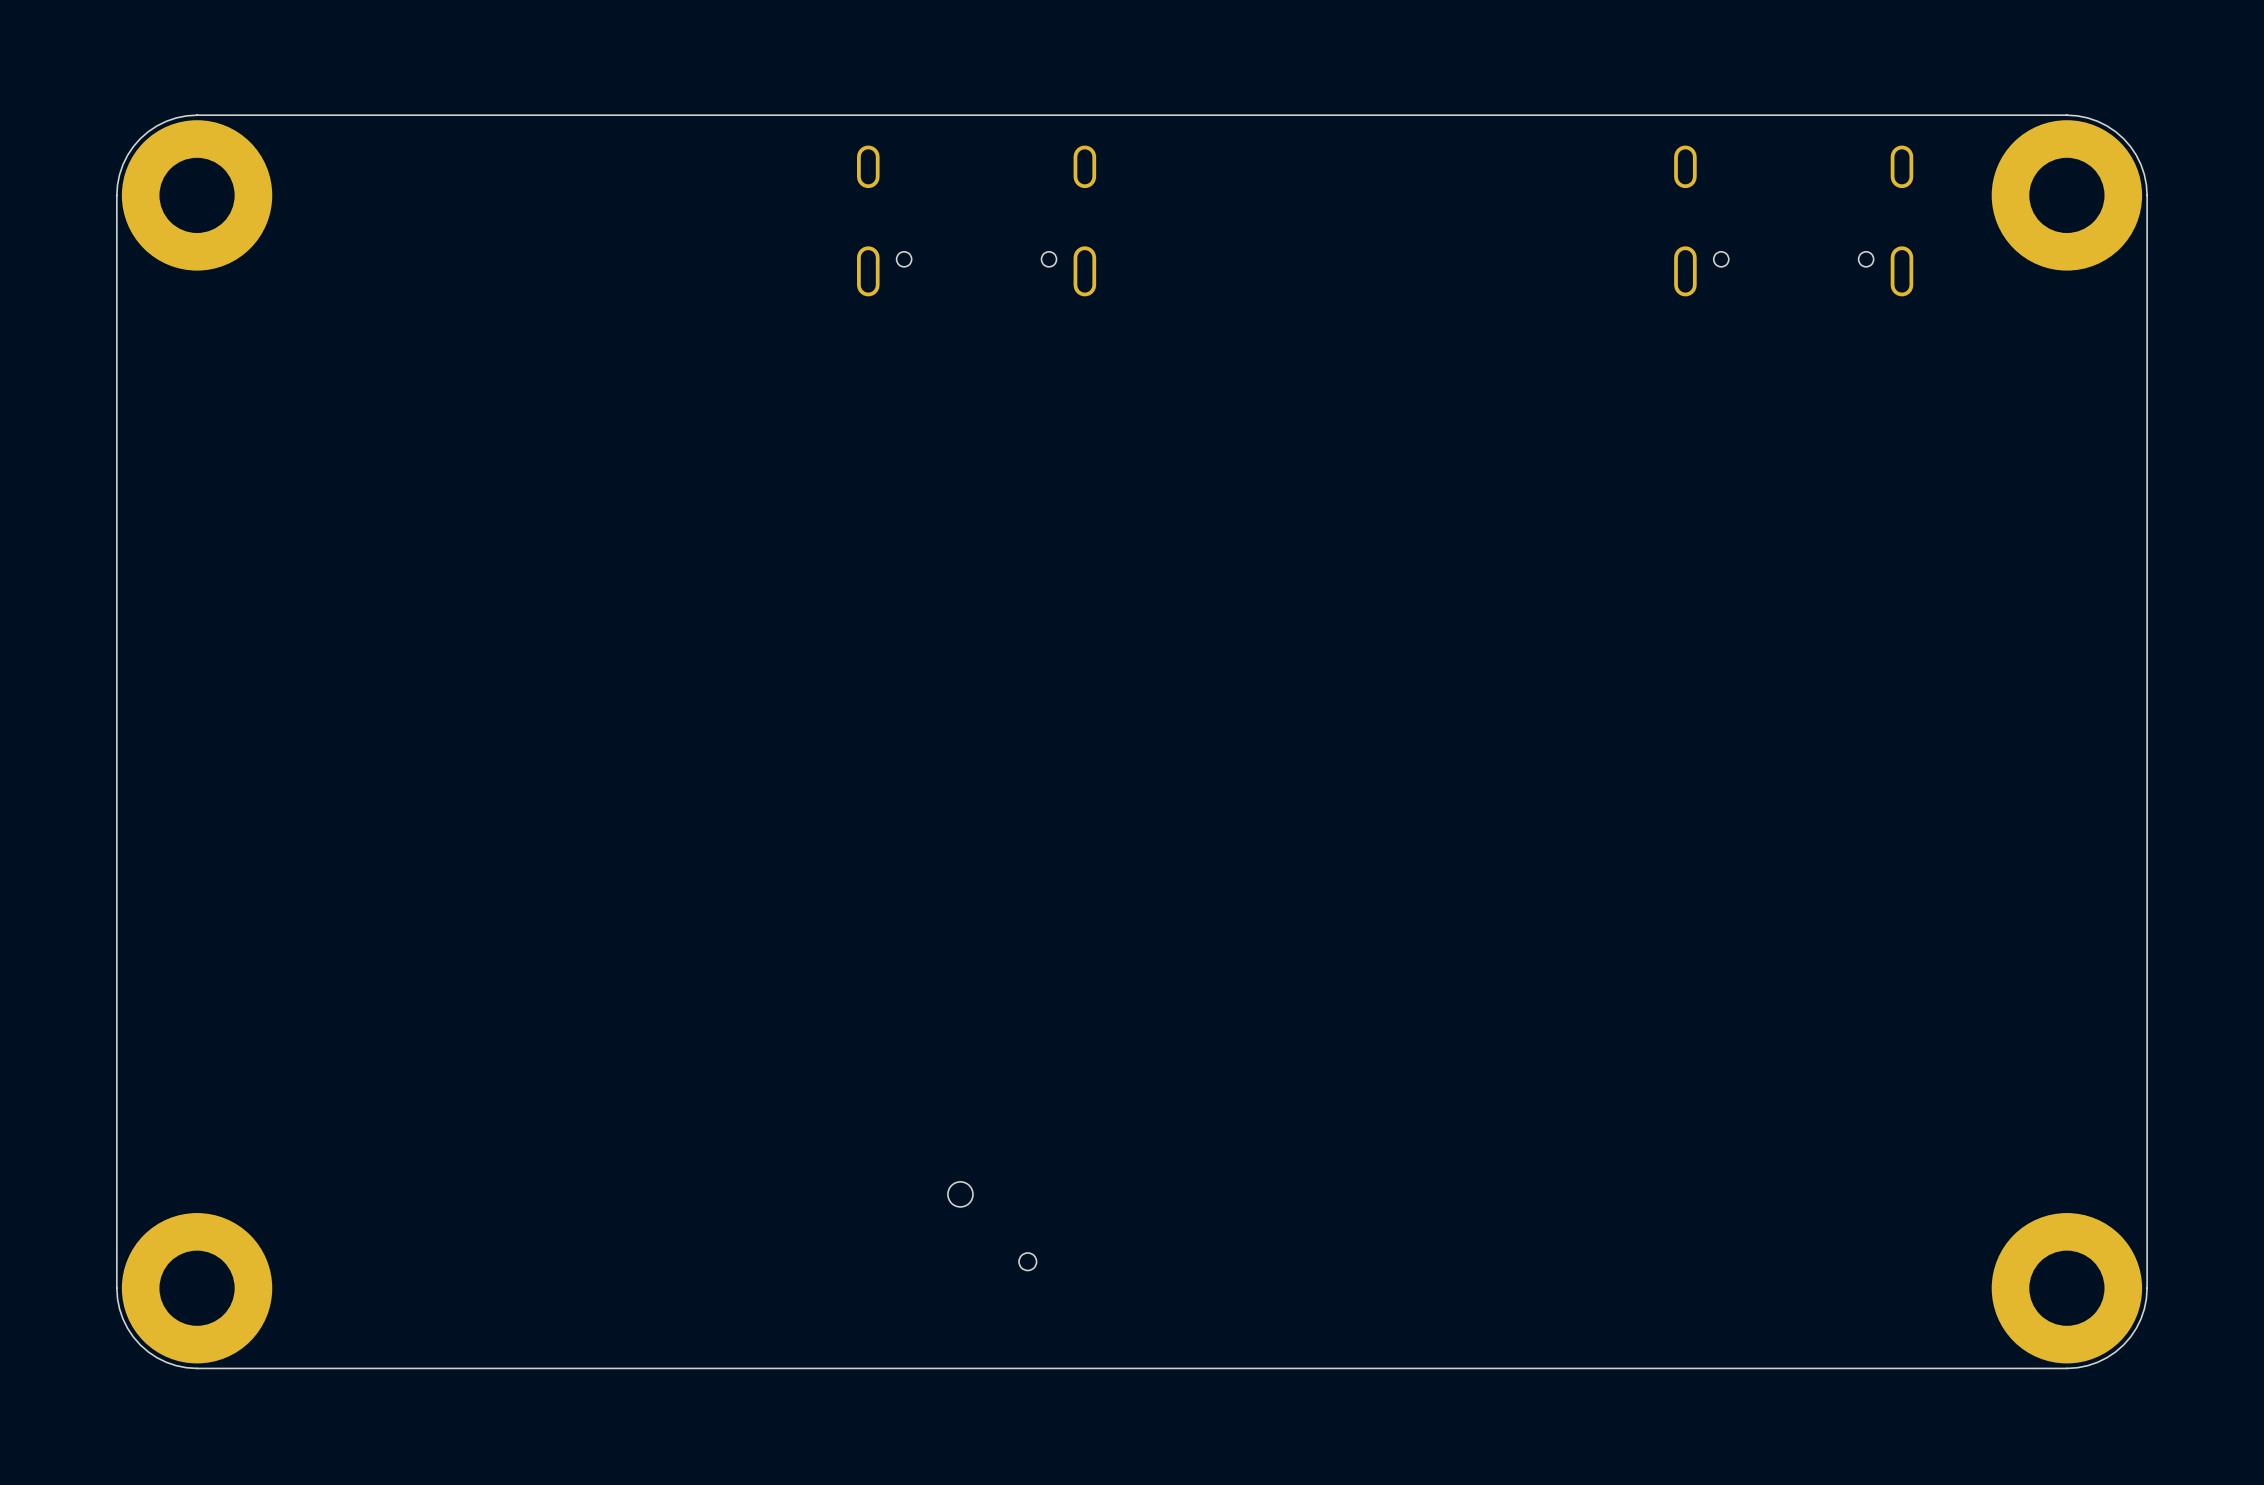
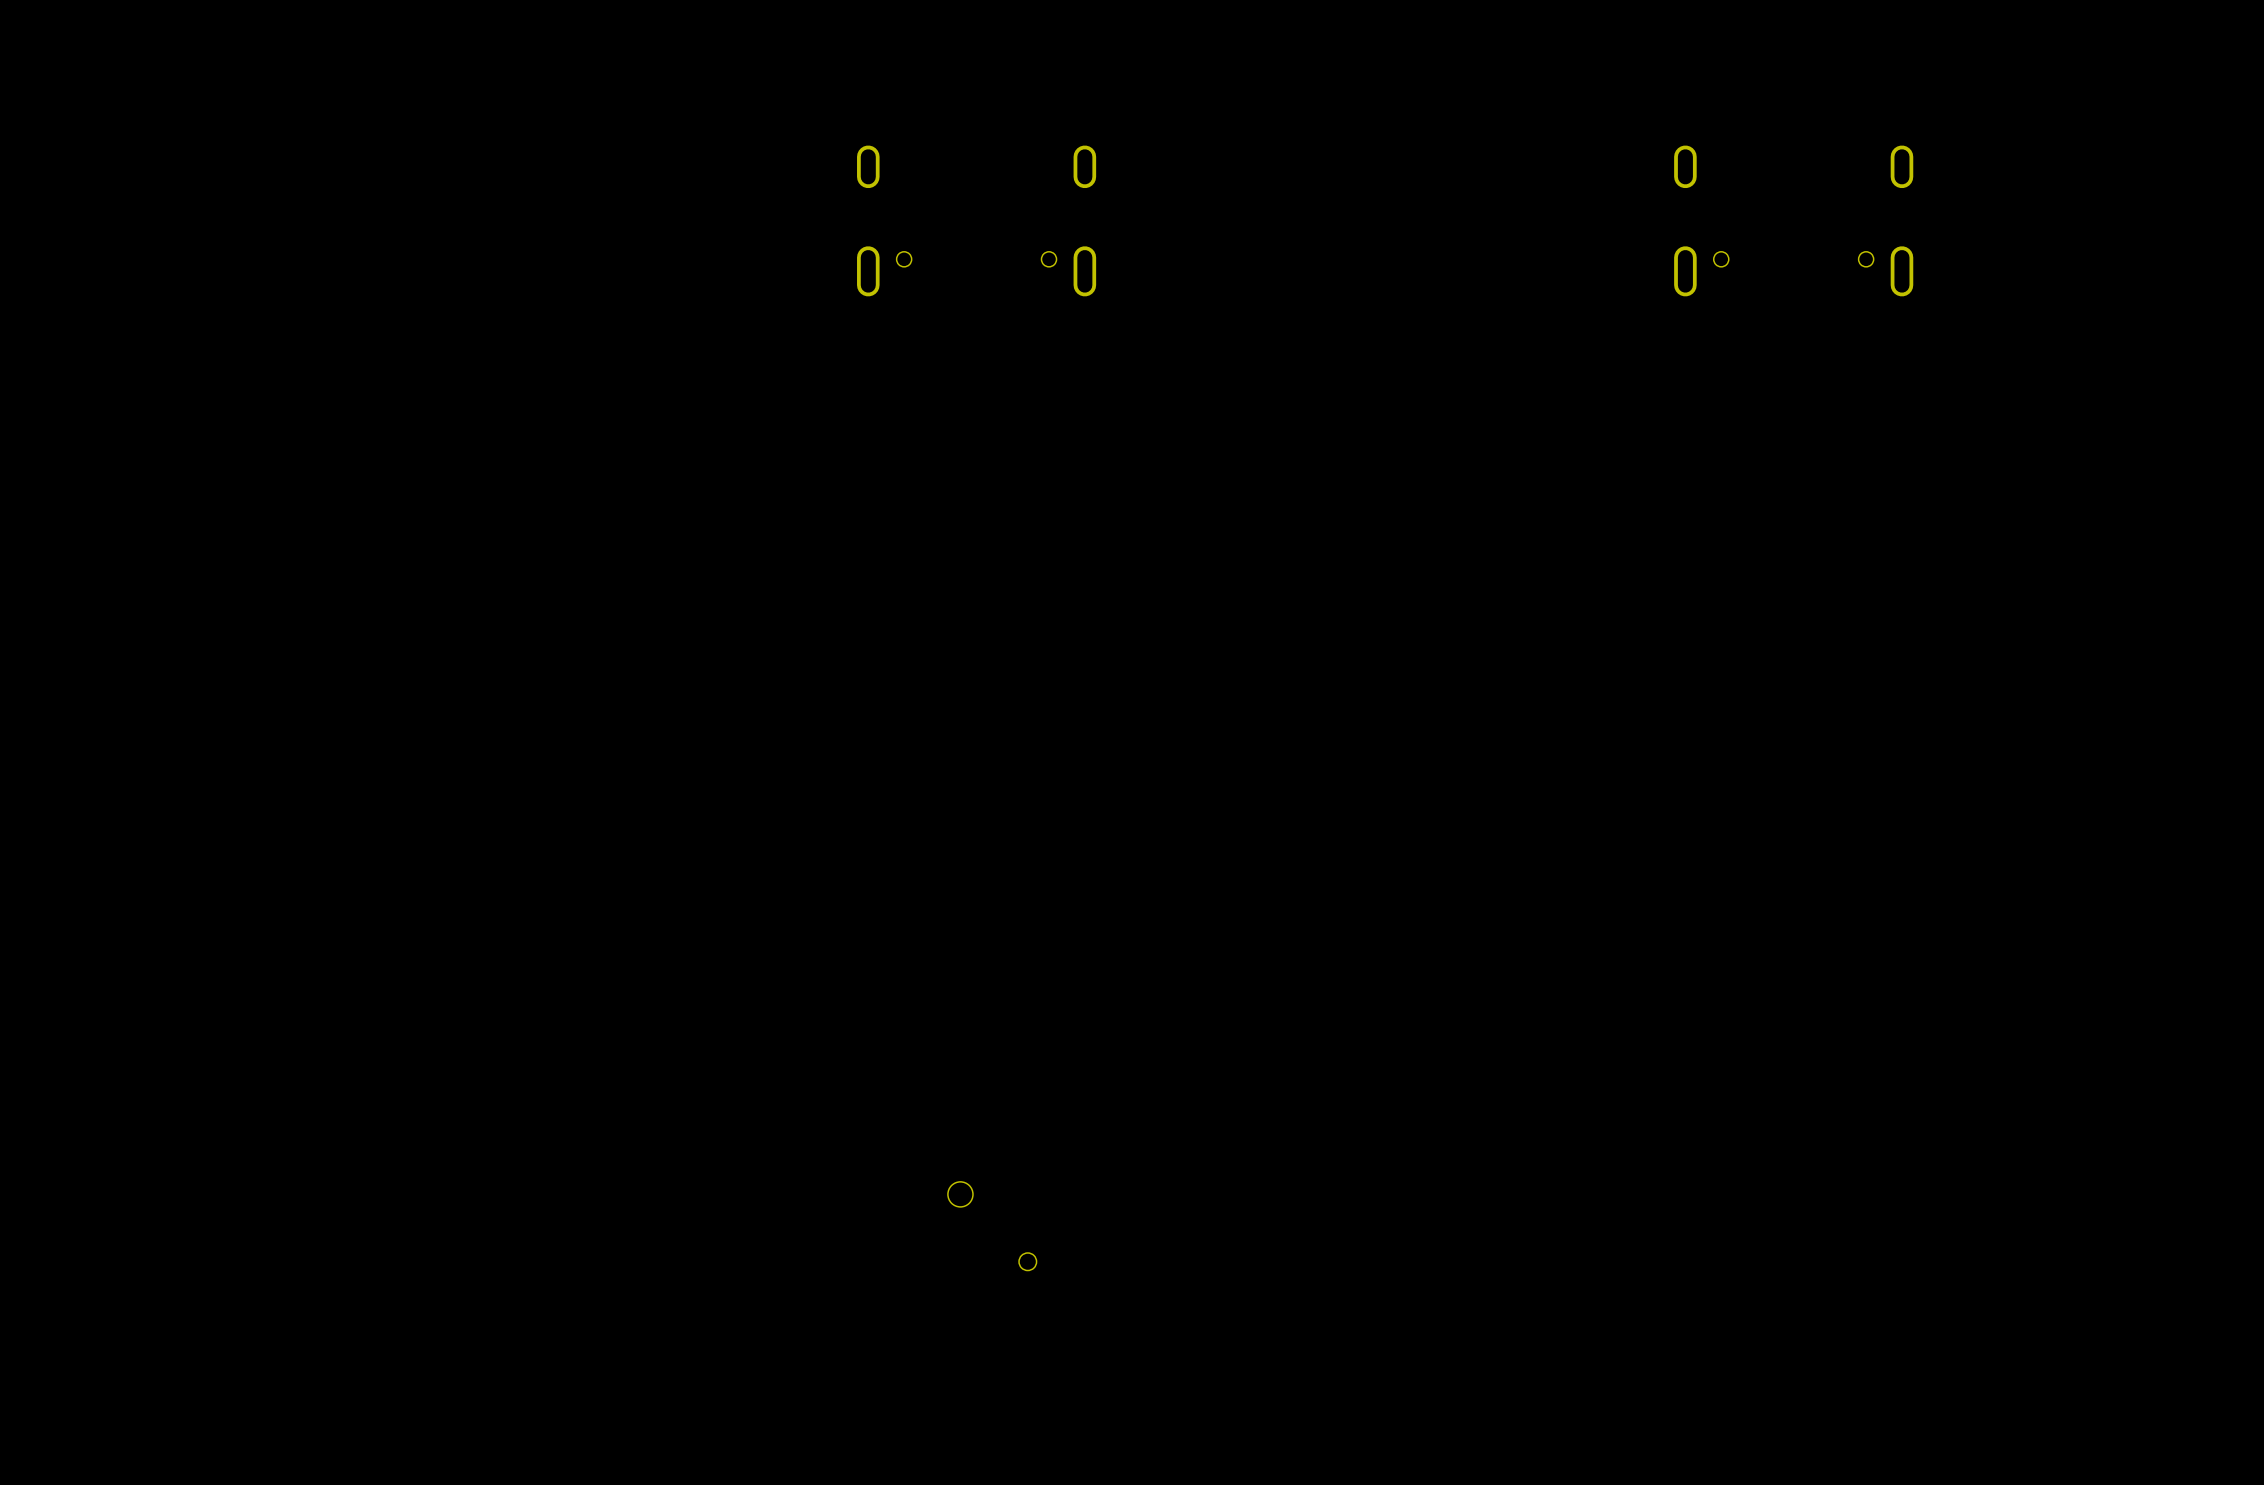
board edge: (2066, 115) (197, 115) (176, 117) (156, 125) (140, 138) (127, 155) (119, 174) (116, 195) (116, 1288) (119, 1308) (127, 1328) (140, 1344) (156, 1357) (176, 1365) (197, 1368) (2066, 1368) (2087, 1365) (2107, 1357) (2123, 1344) (2136, 1328) (2144, 1308) (2147, 1288) (2147, 195) (2141, 164) (2123, 138) (2097, 121) (2066, 115) -> none
part: (197, 195) -> none
part: (2066, 195) -> none
part: (197, 1288) -> none
part: (2066, 1288) -> none

